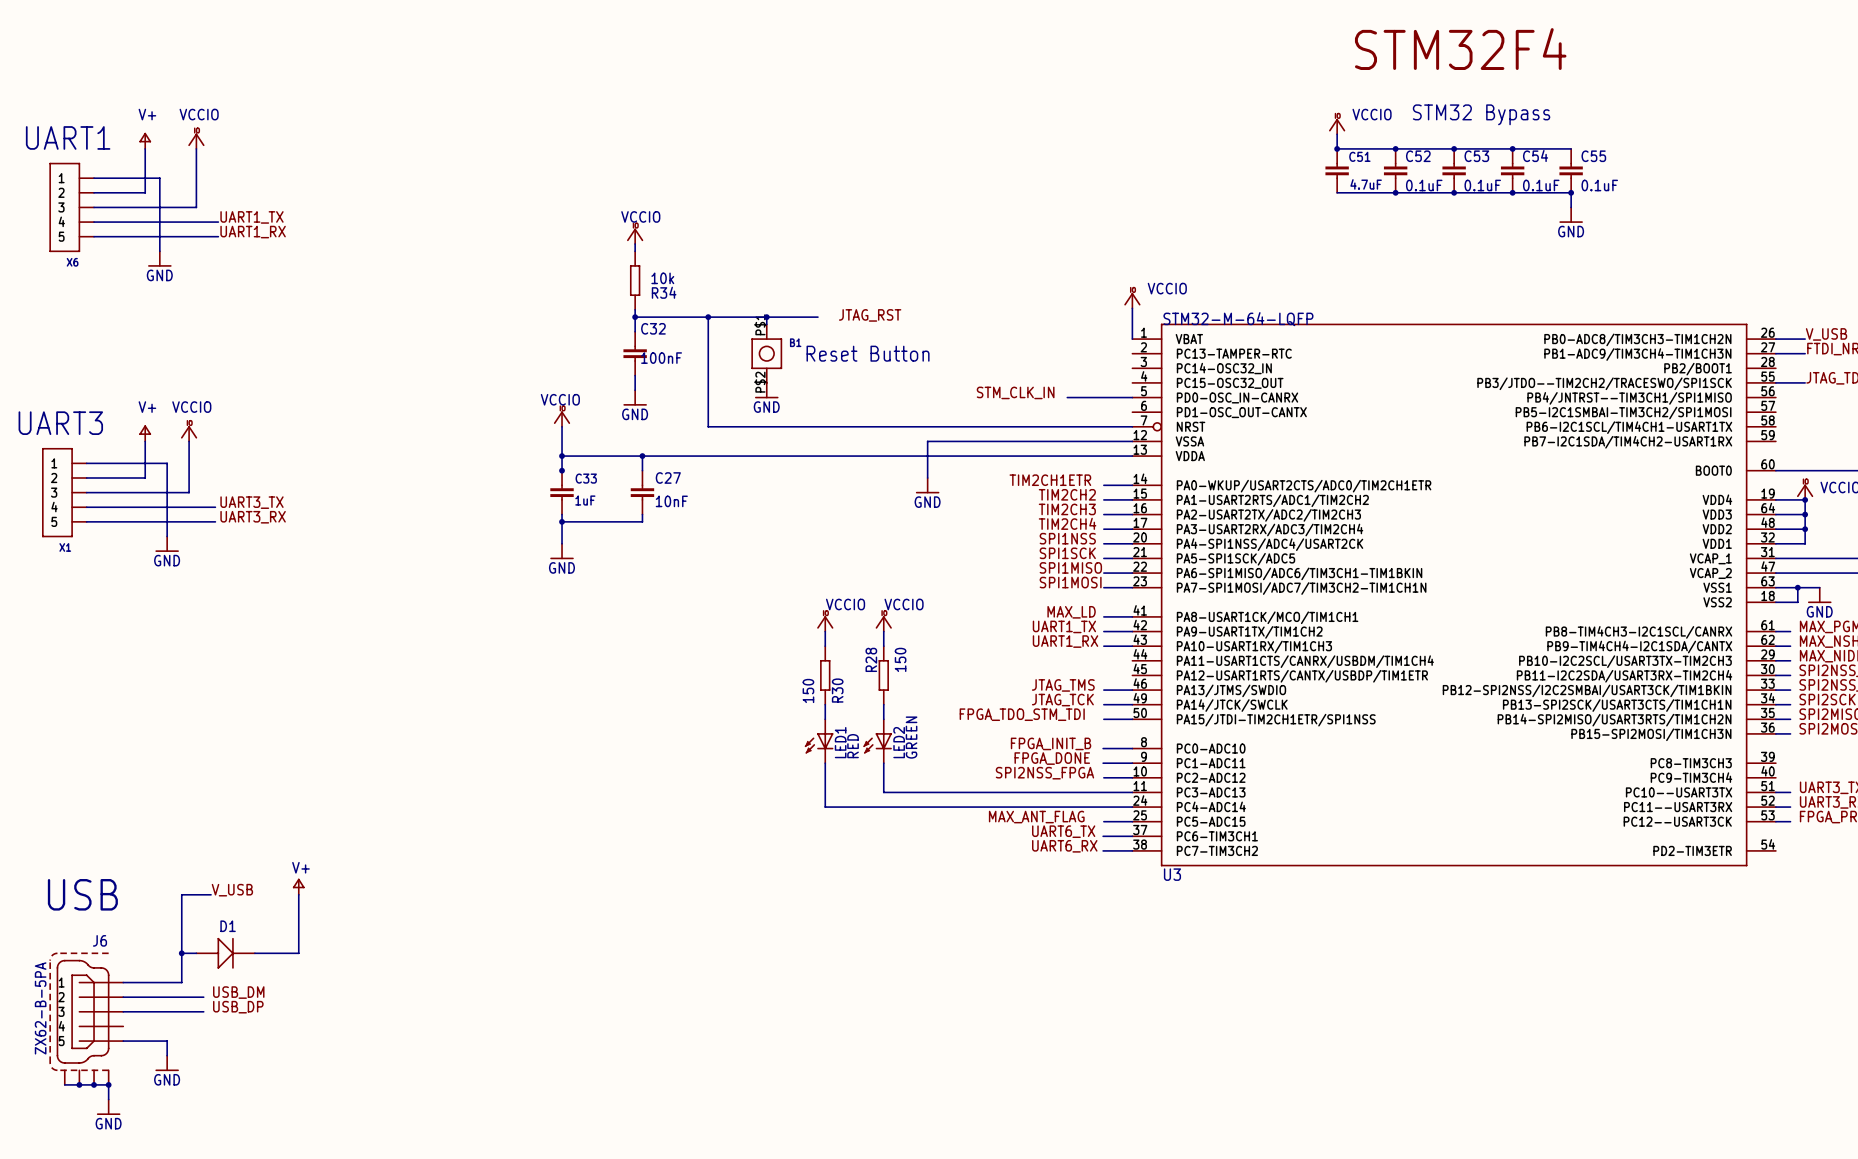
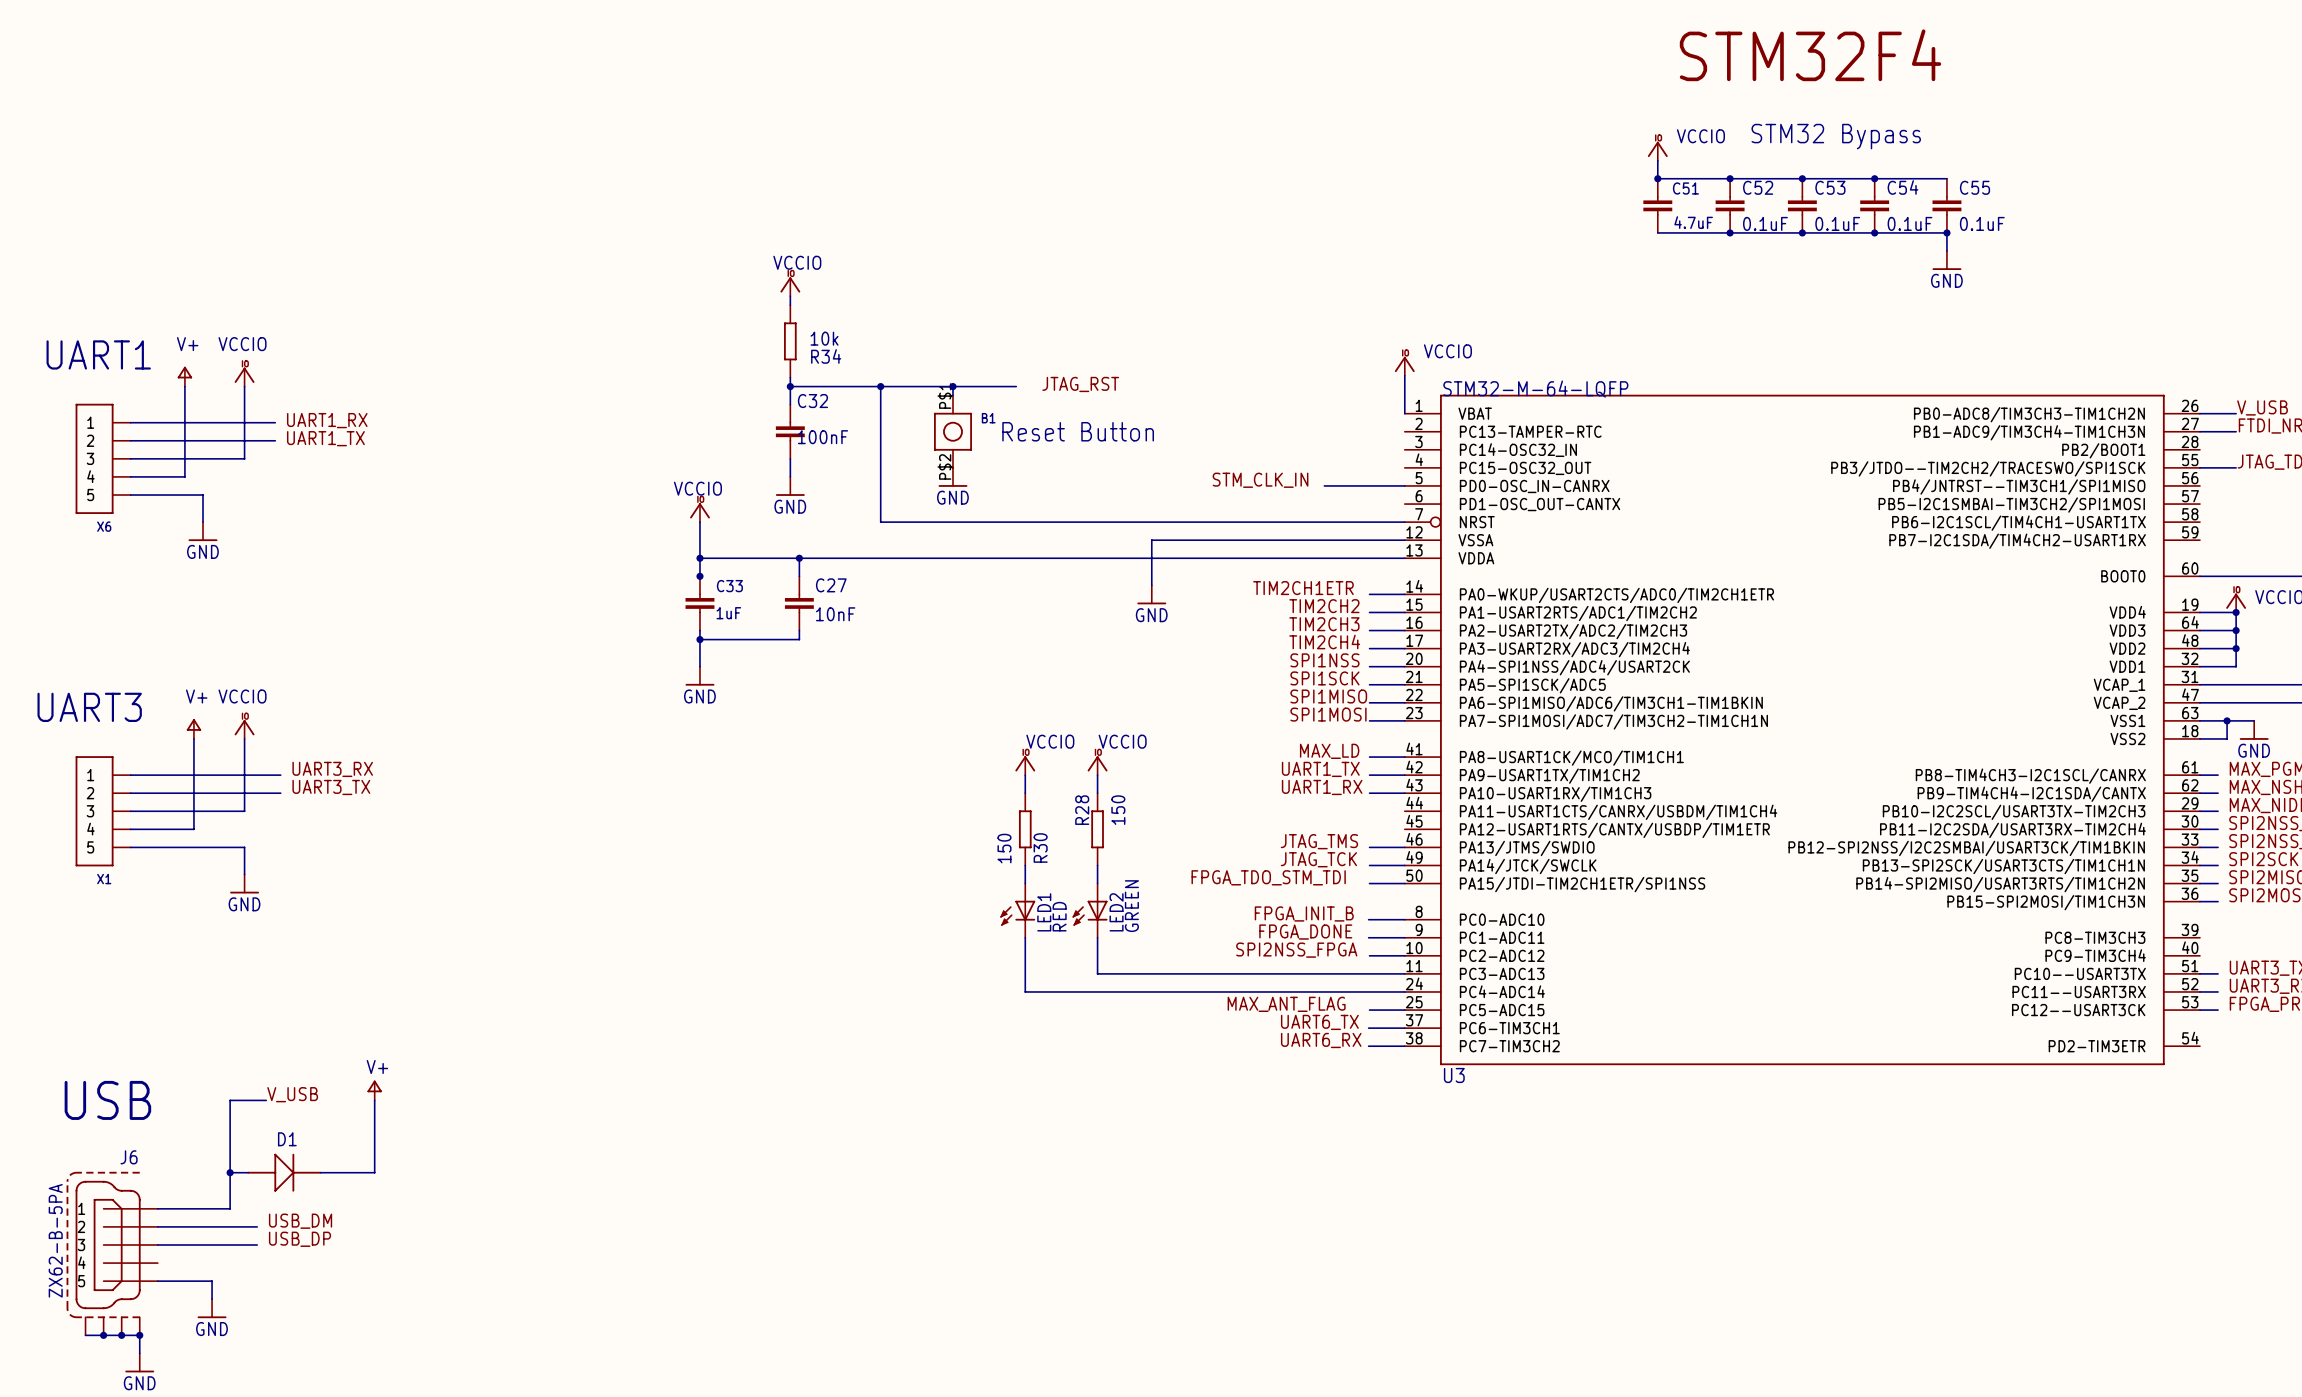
text: UART1 (68, 137) -> none
power symbol: V+ (145, 140) -> none
power symbol: VCCIO (196, 141) -> none
wire: (145, 148) (145, 192) (94, 192) -> none
wire: (196, 148) (196, 207) (94, 207) -> none
wire: (94, 178) (159, 178) (159, 251) -> none
X6 position: (71, 207) -> (103, 458)
label position: UART1_TX (251, 217) -> UART1_TX (325, 438)
wire: (94, 222) (218, 222) -> none
label position: UART1_RX (253, 232) -> UART1_RX (327, 420)
wire: (94, 236) (218, 236) -> none
power symbol: GND (159, 258) -> none
text: none -> UART1 (98, 354)
power symbol: none -> V+ (184, 376)
power symbol: none -> VCCIO (244, 377)
wire: none -> (184, 386) (184, 476) (130, 476)
wire: none -> (244, 386) (244, 458) (130, 458)
wire: none -> (130, 422) (275, 422)
wire: none -> (130, 440) (275, 440)
wire: none -> (130, 495) (203, 495) (203, 522)
text: UART3 (60, 423) -> none
power symbol: V+ (145, 433) -> none
power symbol: VCCIO (189, 433) -> none
power symbol: none -> GND (203, 531)
wire: (145, 441) (145, 478) (86, 478) -> none
wire: (189, 441) (189, 492) (86, 492) -> none
wire: (86, 463) (167, 463) (167, 536) -> none
X1 position: (64, 492) -> (103, 811)
label position: UART3_TX (251, 502) -> UART3_TX (331, 787)
wire: (86, 507) (215, 507) -> none
label position: UART3_RX (253, 517) -> UART3_RX (332, 769)
wire: (86, 521) (215, 521) -> none
power symbol: GND (167, 544) -> none
text: none -> UART3 (89, 707)
power symbol: none -> V+ (193, 729)
power symbol: none -> VCCIO (244, 729)
wire: none -> (193, 738) (193, 829) (130, 829)
wire: none -> (244, 738) (244, 811) (130, 811)
wire: none -> (130, 775) (280, 775)
wire: none -> (130, 793) (280, 793)
wire: none -> (130, 847) (244, 847) (244, 874)
power symbol: none -> GND (244, 884)

